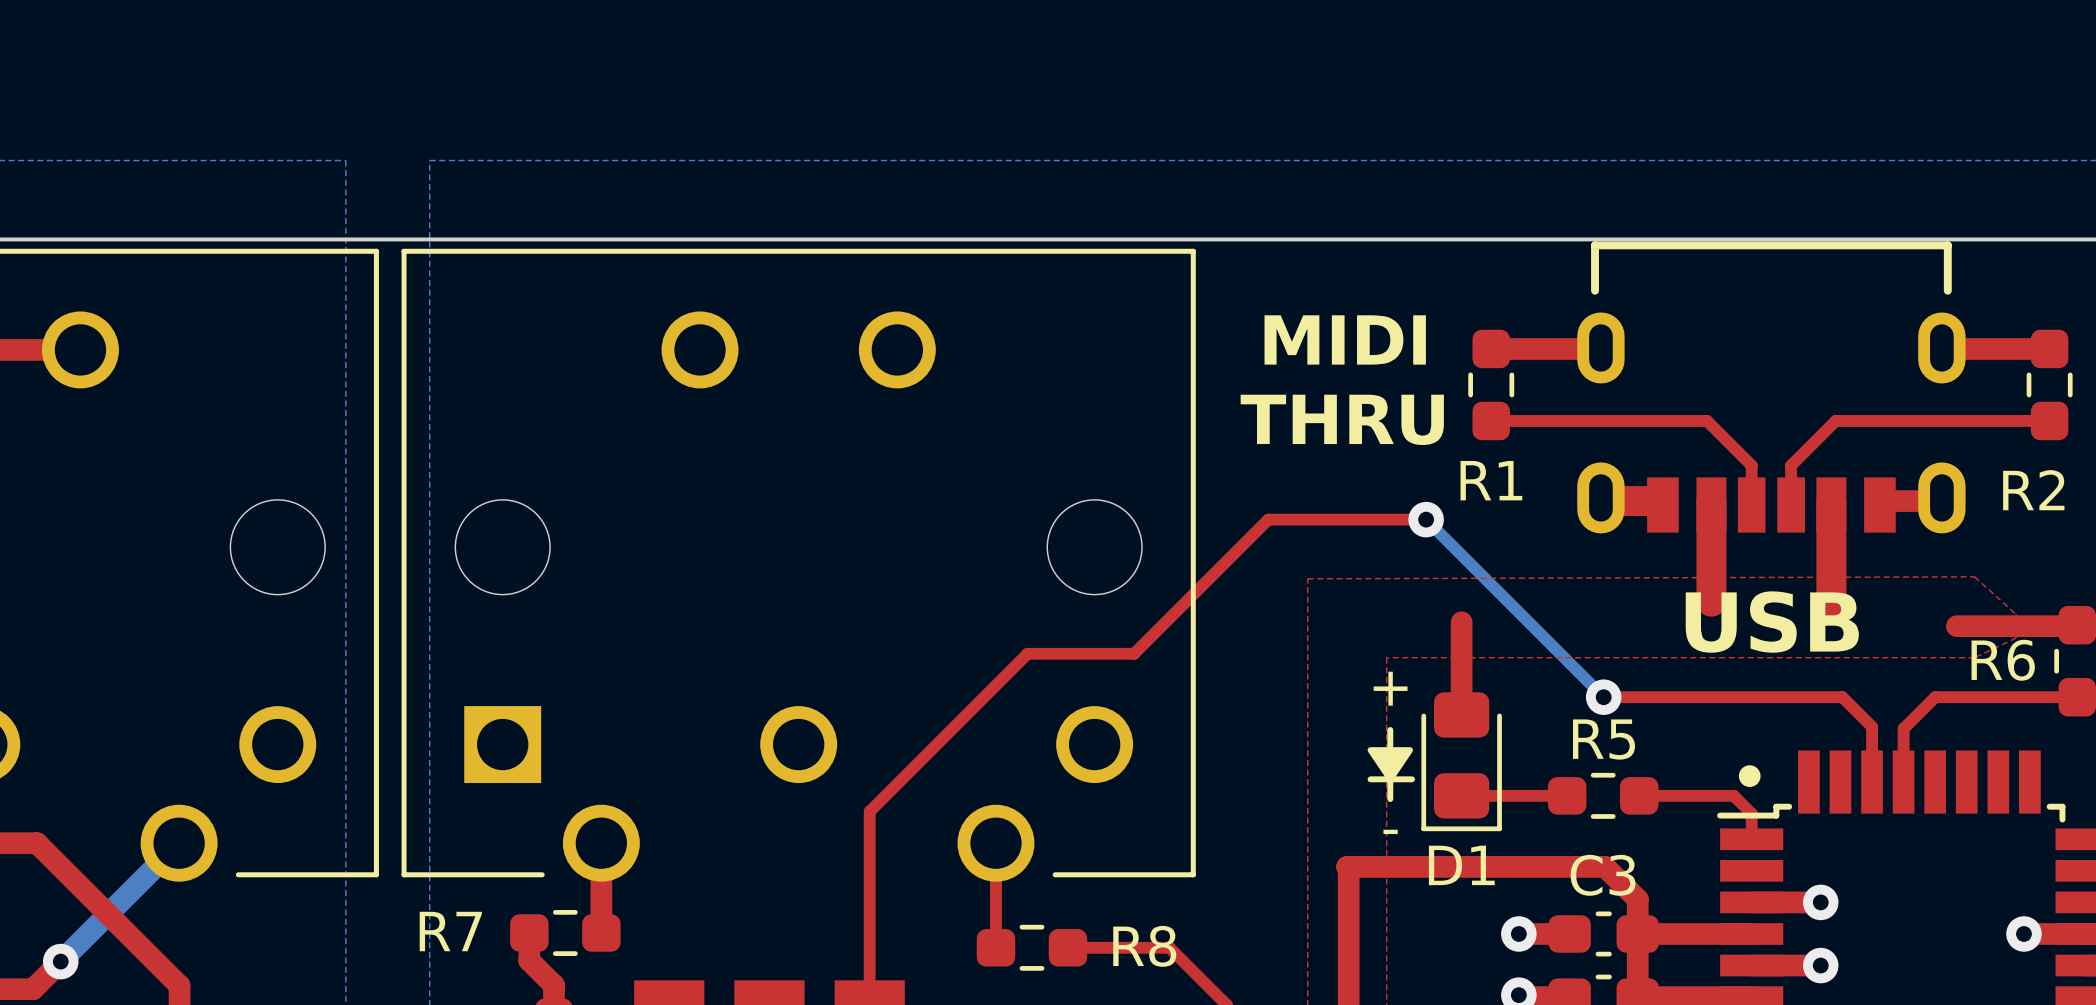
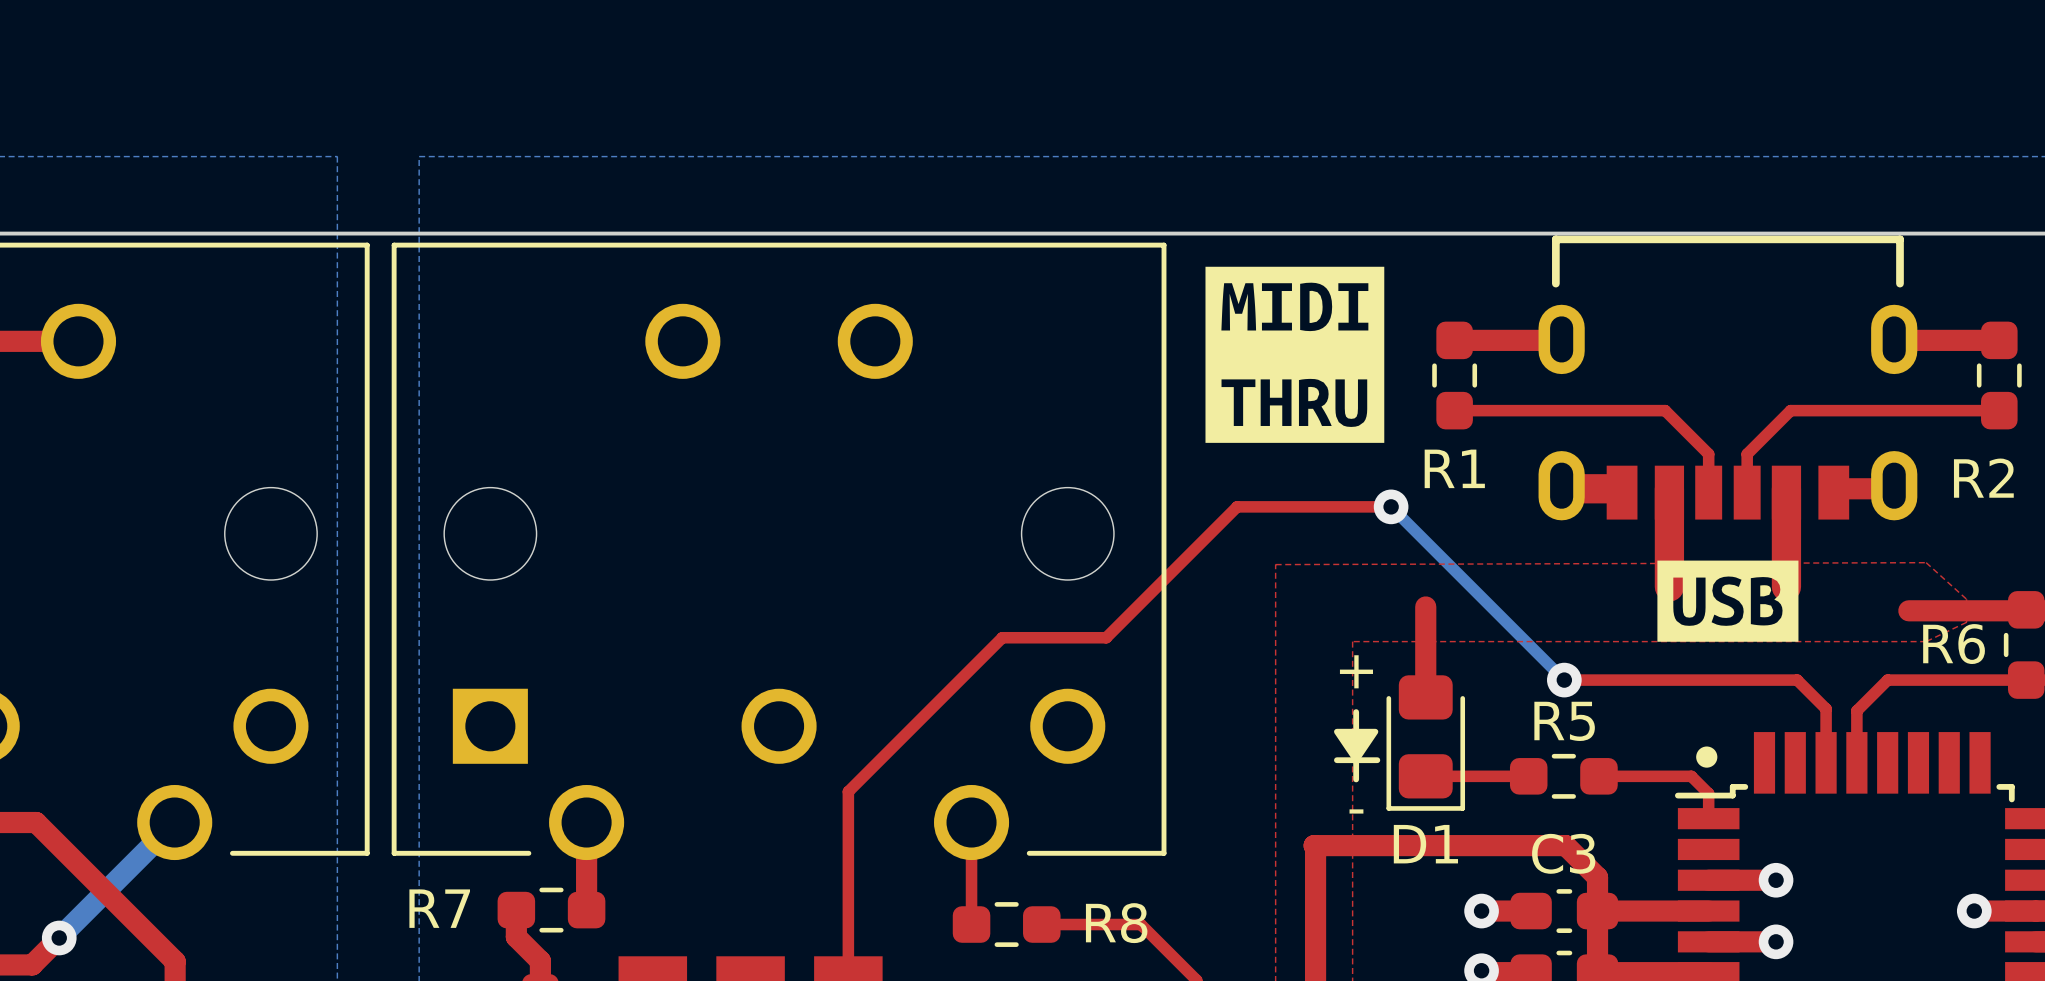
drawing: none -> [1205, 266, 1385, 443]
text: MIDI (1345, 339) -> none
text: THRU (1342, 419) -> none
drawing: none -> [1657, 560, 1799, 642]
text: USB (1772, 622) -> none

